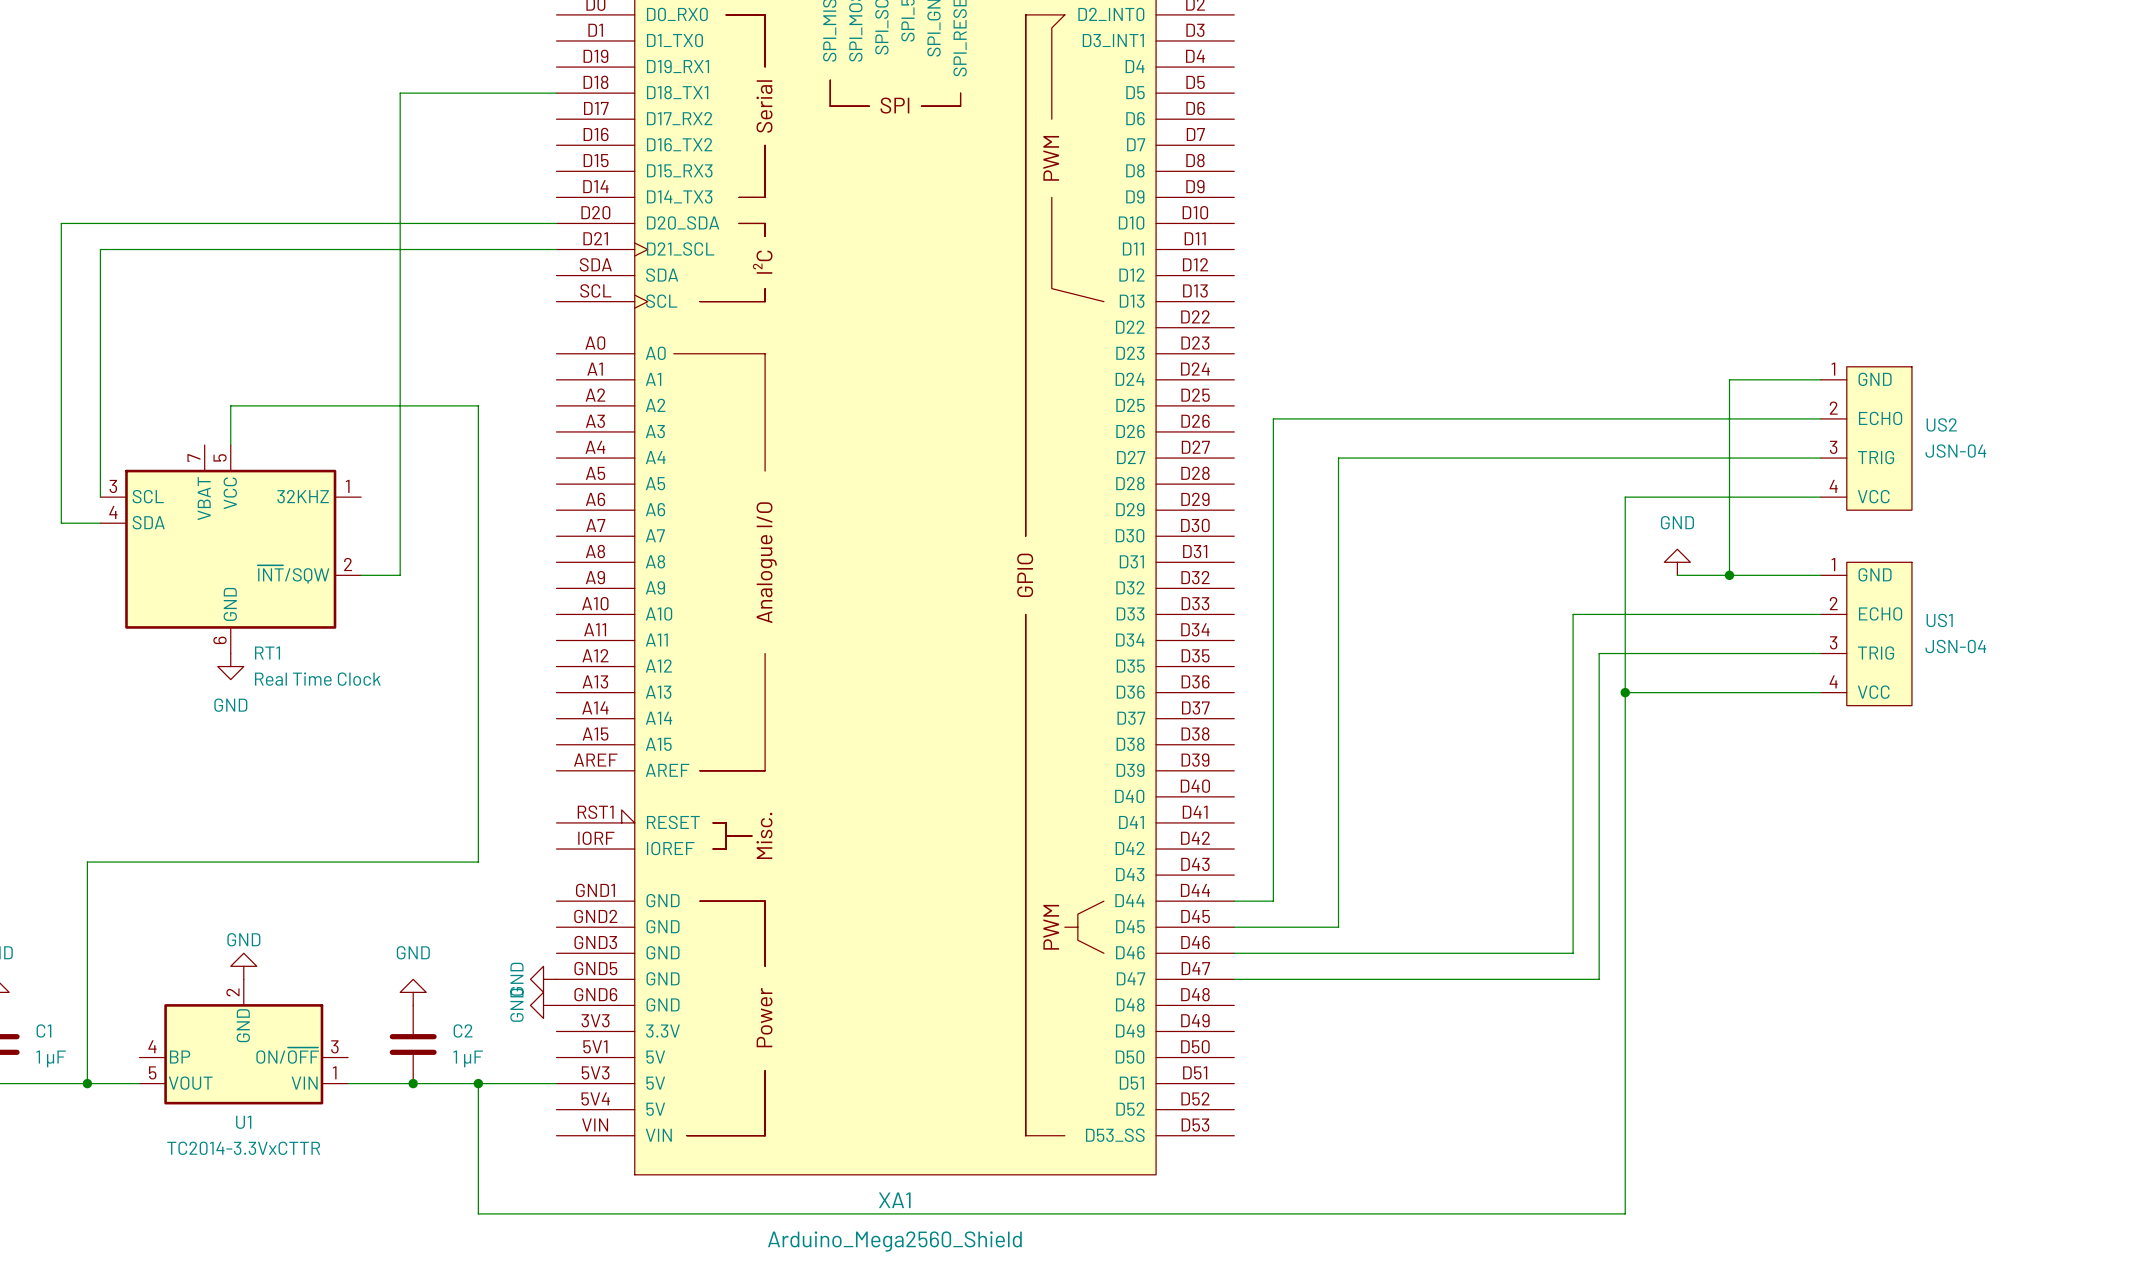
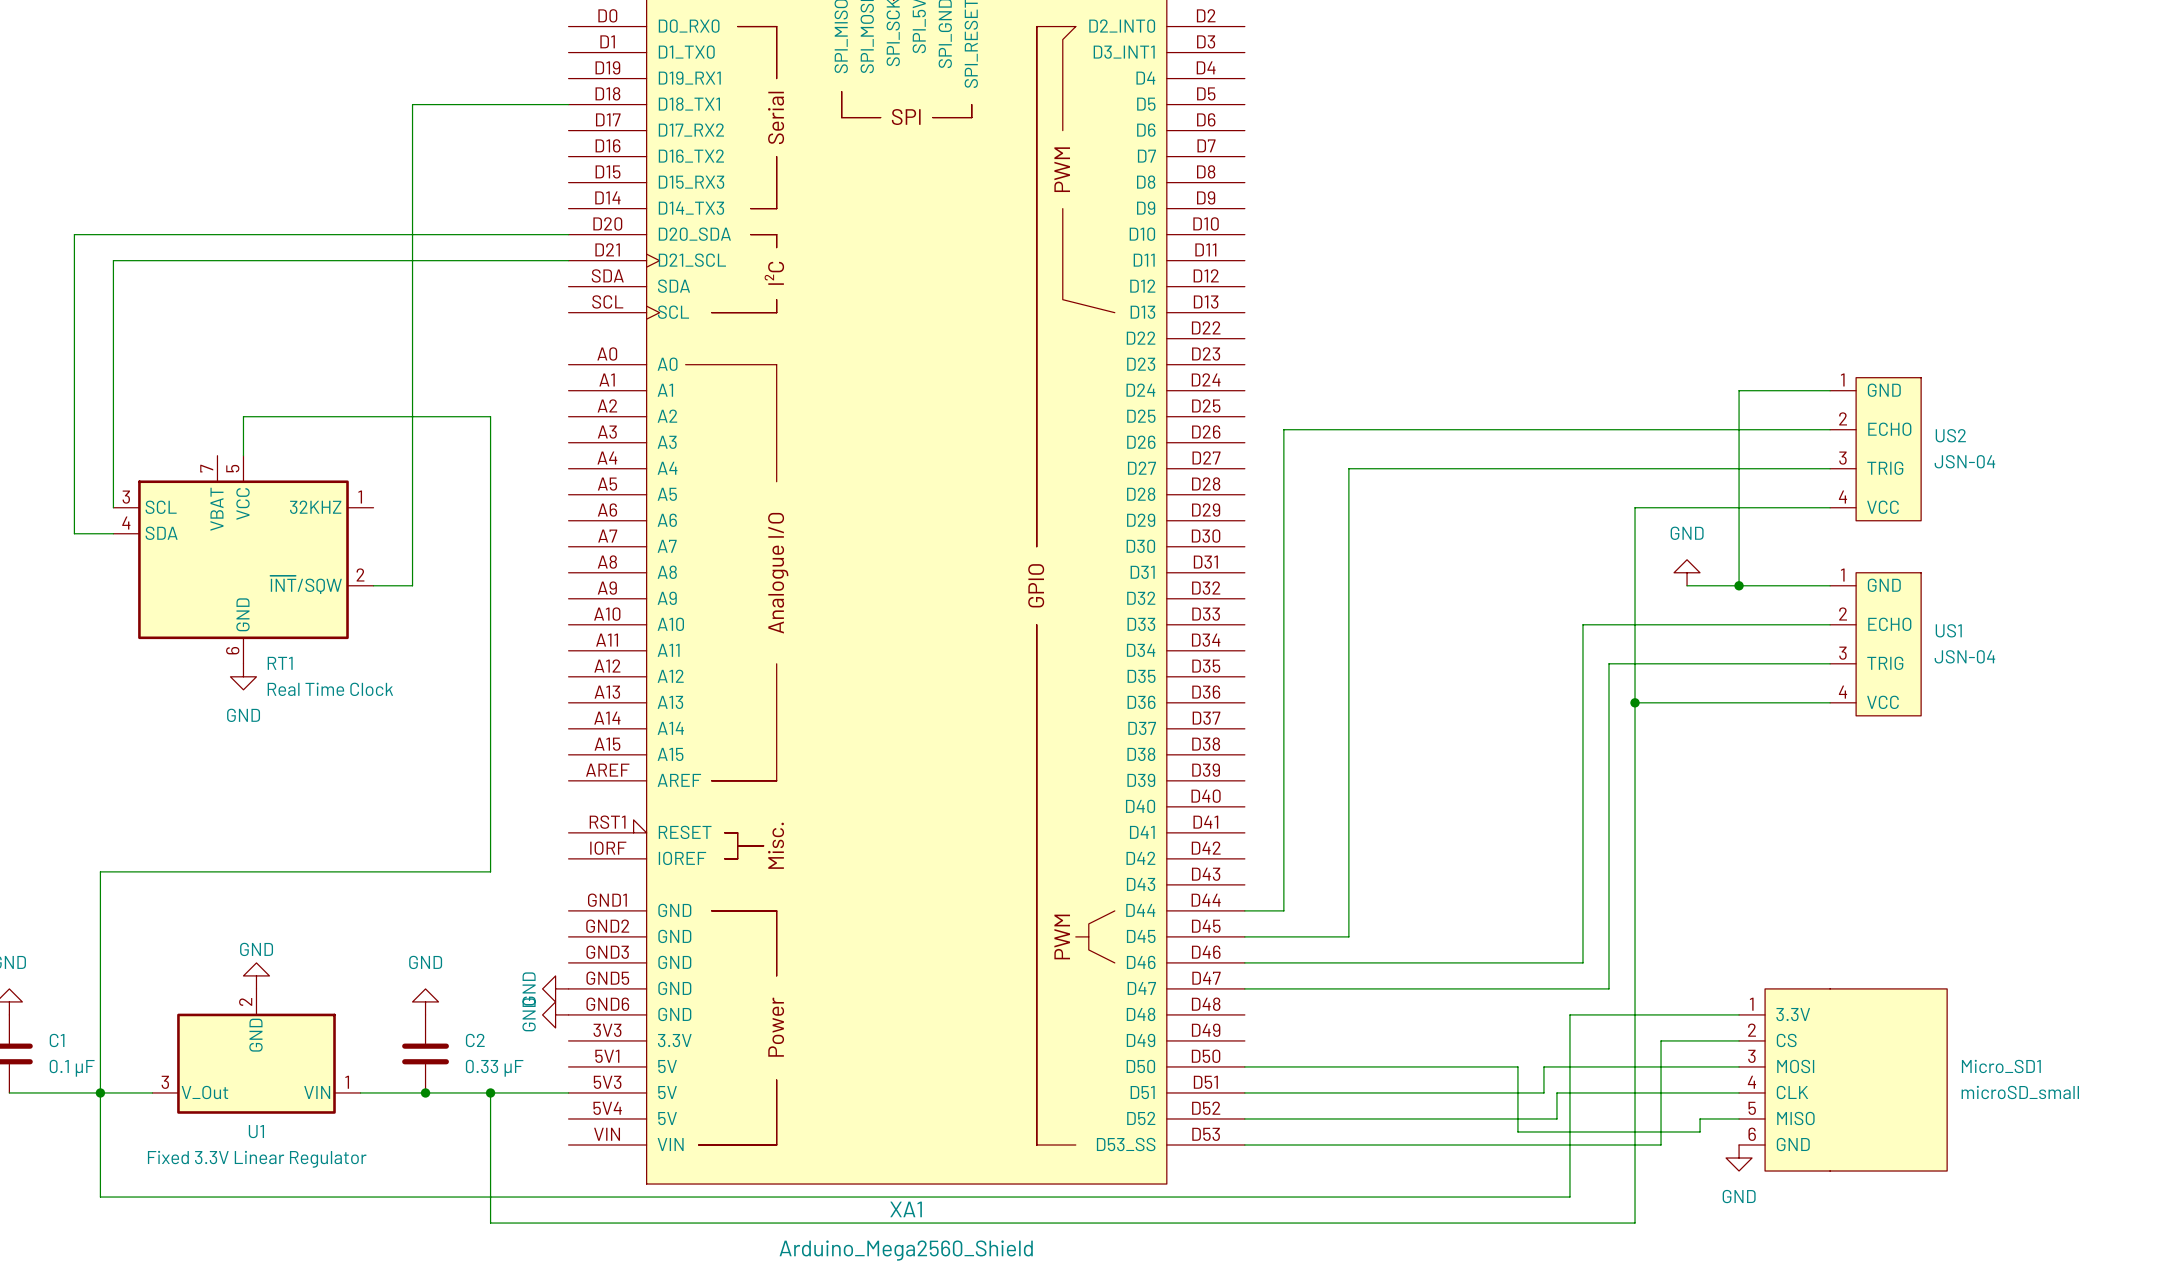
U1 symbol: [139, 979, 349, 1105] -> [152, 988, 361, 1114]
wire: none -> (1739, 1014) (1569, 1014) (1569, 1197) (100, 1197) (100, 1092)
wire: none -> (1739, 1040) (1661, 1040) (1661, 1145) (1244, 1145)
wire: none -> (1244, 1066) (1517, 1066) (1517, 1131) (1700, 1131) (1700, 1118) (1739, 1118)
wire: none -> (1739, 1066) (1543, 1066) (1543, 1092) (1244, 1092)
C1 value: 1 µF (51, 1058) -> 0.1 µF (72, 1068)
C2 value: 1 µF (468, 1058) -> 0.33 µF (494, 1068)
Micro_SD1: none -> microSD_small (1843, 1079)
wire: none -> (1739, 1092) (1556, 1092) (1556, 1118) (1244, 1118)
U1 value: TC2014-3.3VxCTTR (243, 1148) -> Fixed 3.3V Linear Regulator (257, 1159)
power symbol: none -> GND (1739, 1158)

